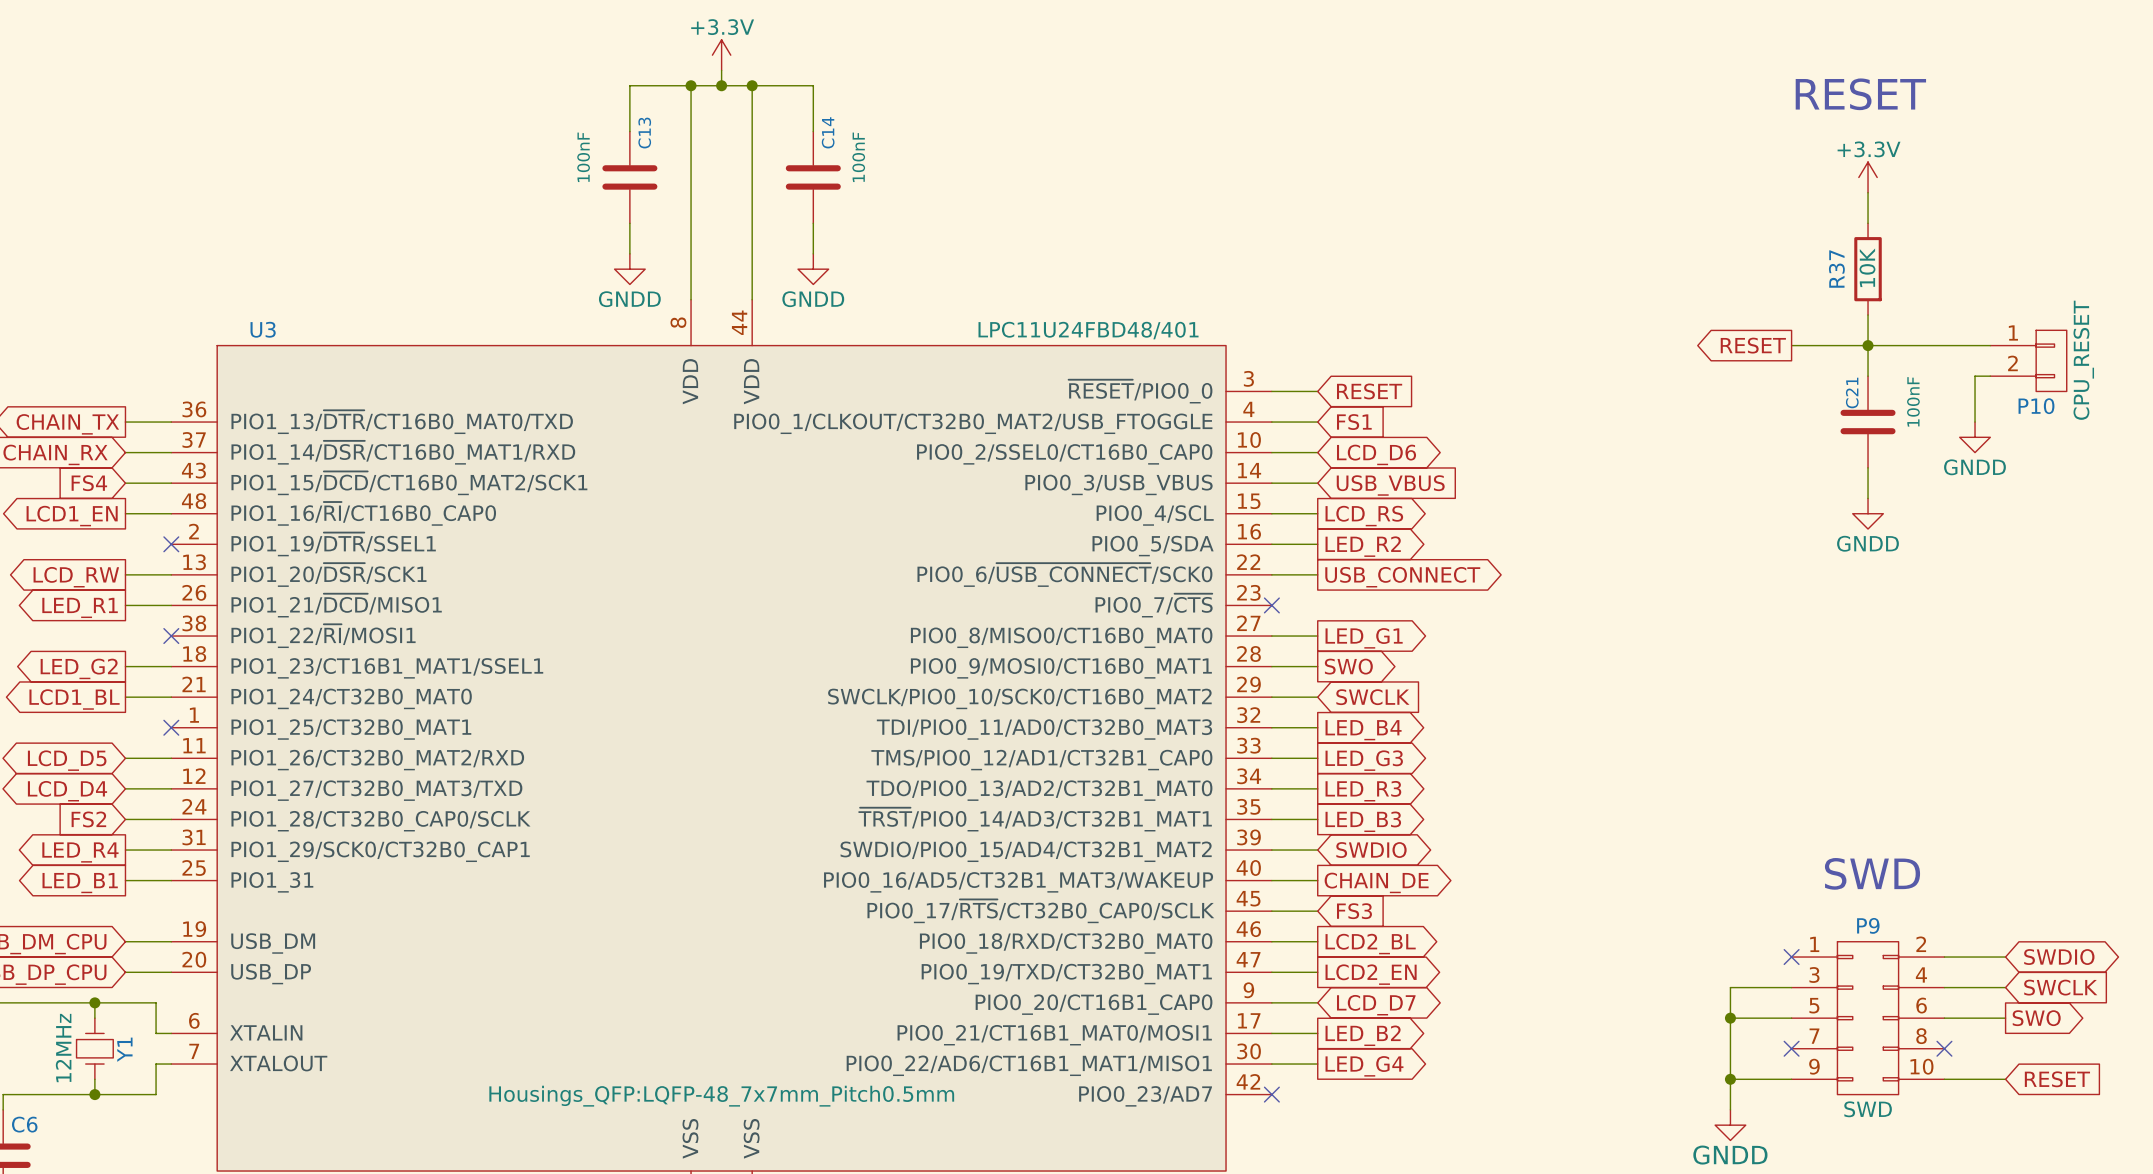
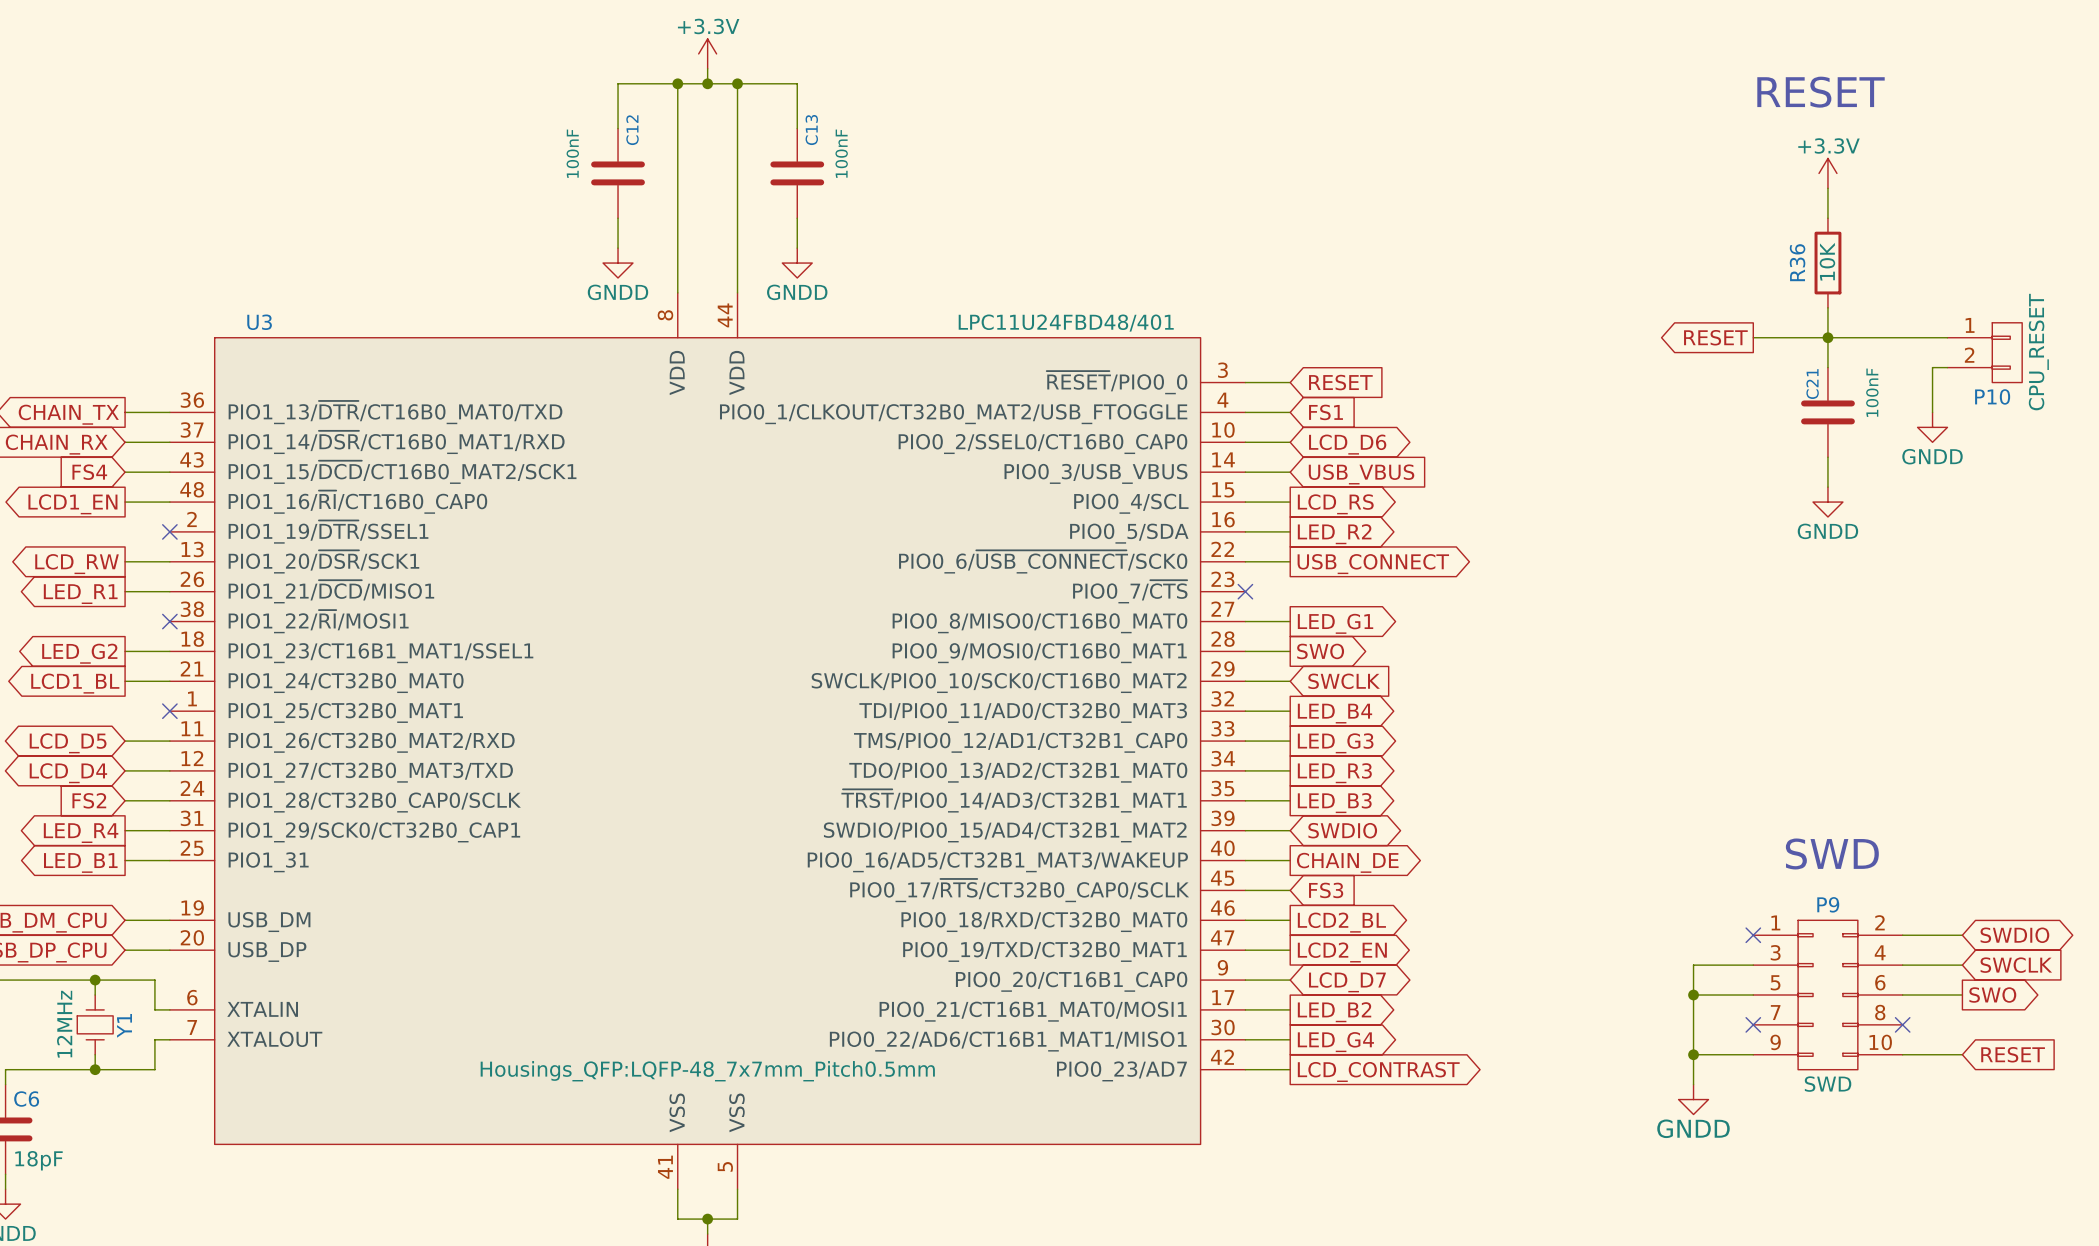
C14 name: C14 (828, 132) -> C13 (811, 130)
C13 name: C13 (644, 133) -> C12 (632, 130)
R37 name: R37 (1836, 269) -> R36 (1797, 262)
wire: none -> (1245, 1069) (1290, 1069)
no-connect mark: (1271, 1094) -> none
global label: none -> LCD_CONTRAST (1378, 1071)

